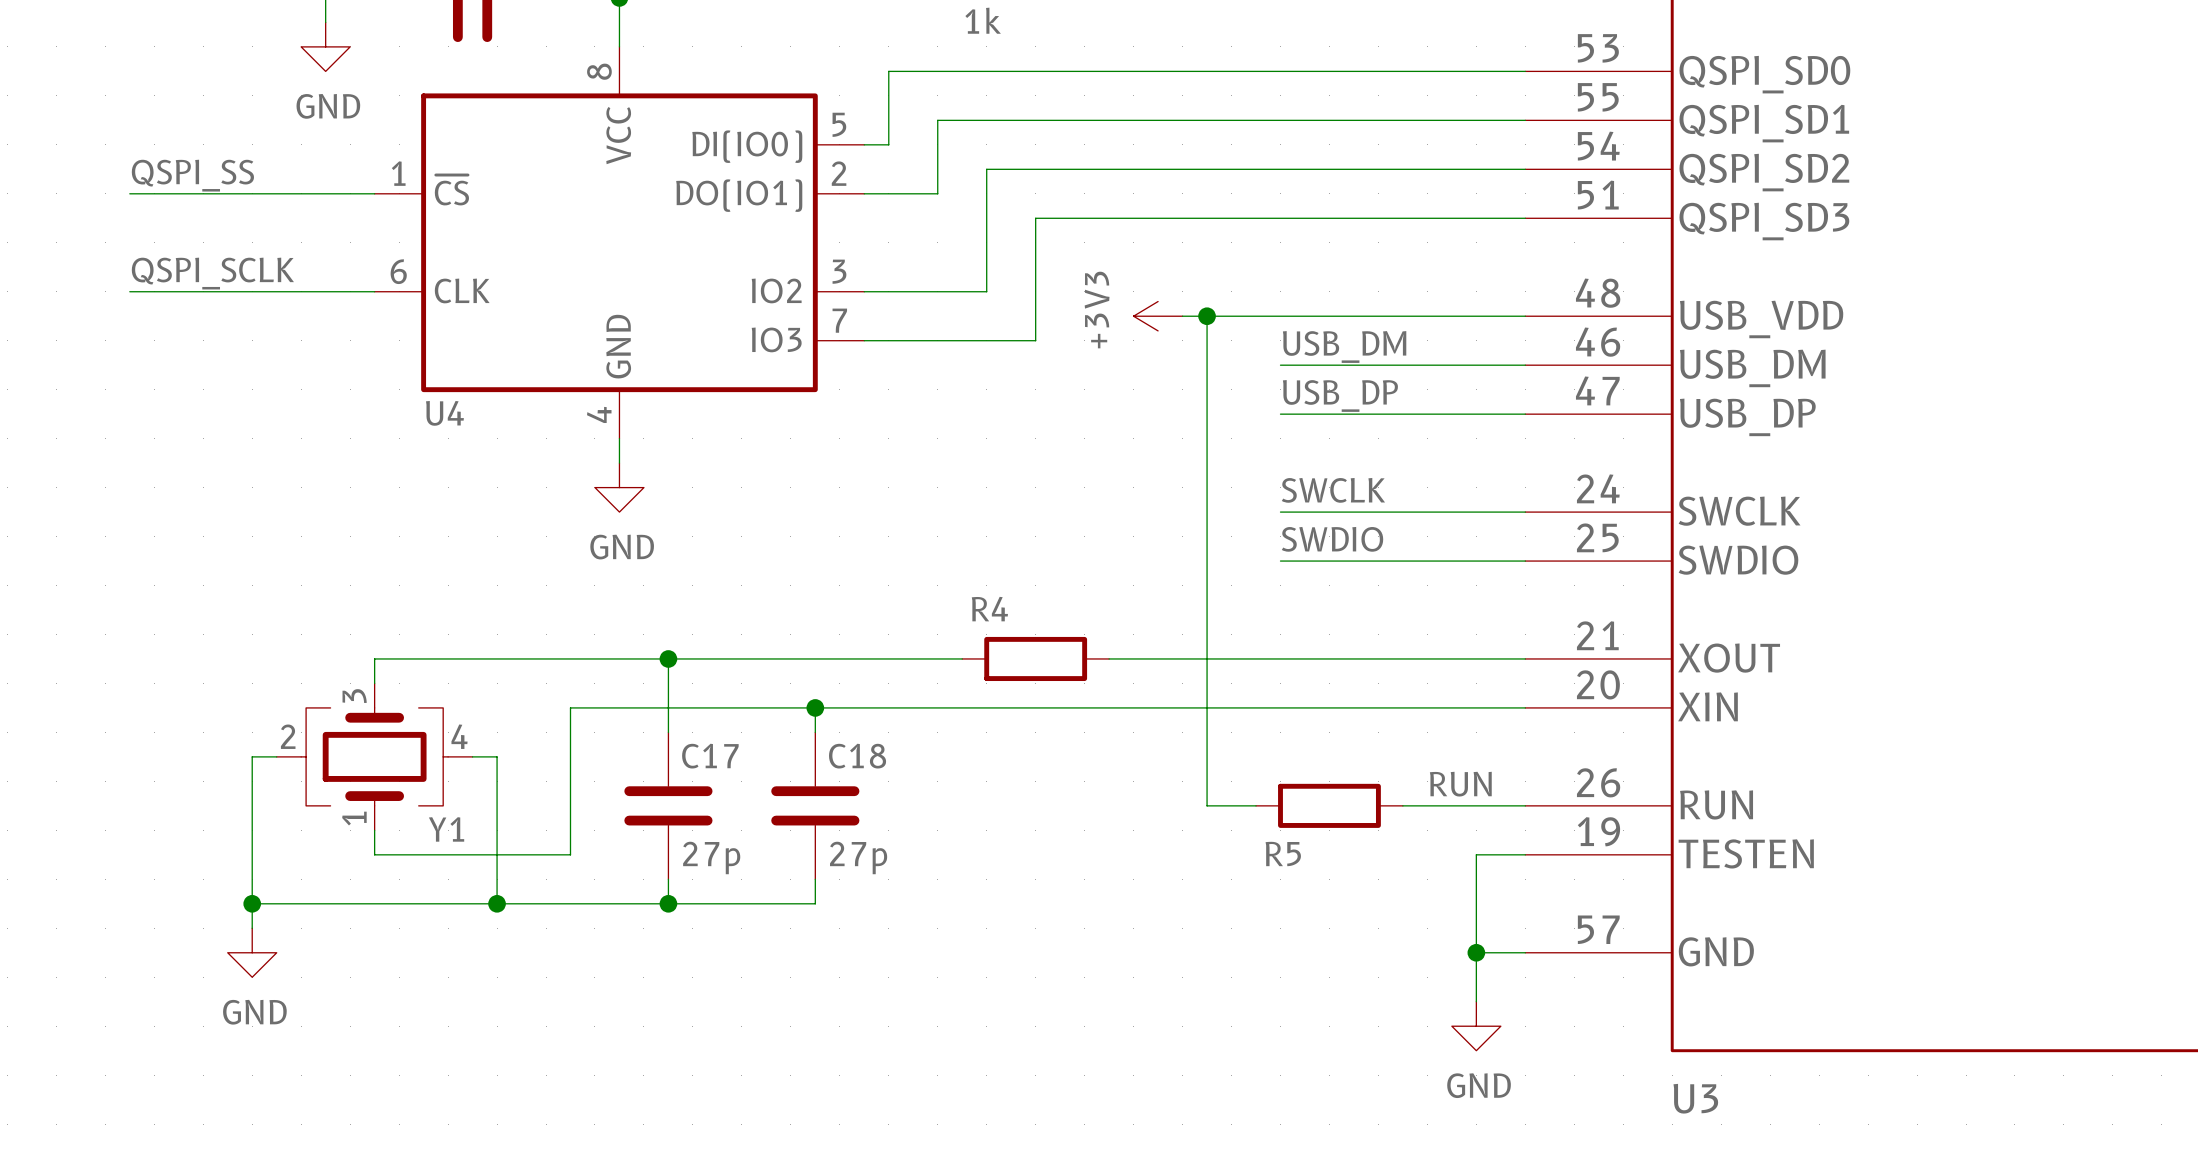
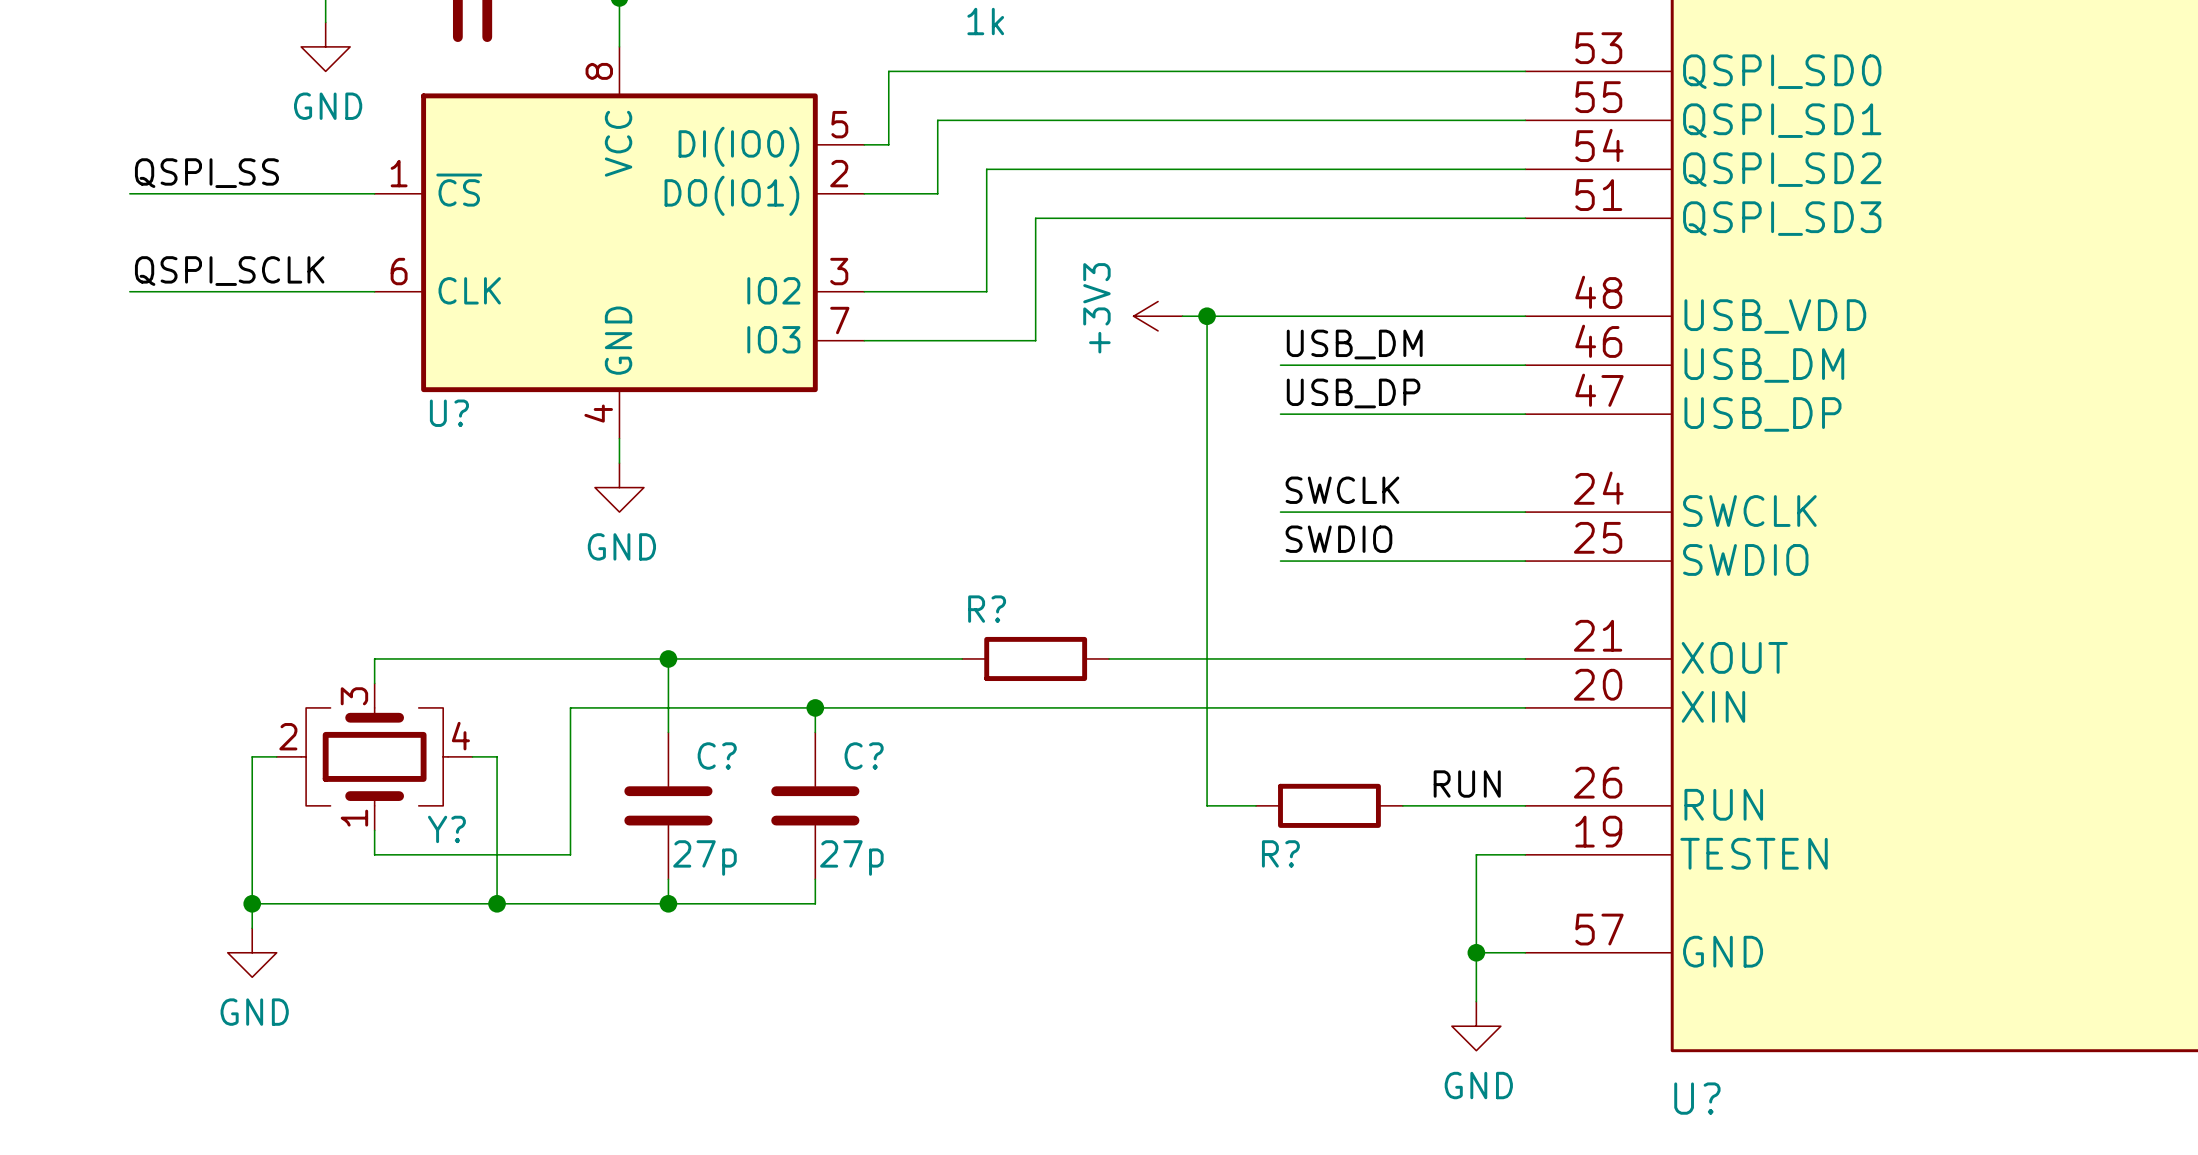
U4 name: U4 (444, 413) -> U? (449, 413)
R4 name: R4 (989, 609) -> R? (987, 609)
C17 name: C17 (710, 756) -> C? (717, 755)
C18 name: C18 (857, 756) -> C? (864, 755)
Y1 name: Y1 (446, 829) -> Y? (446, 829)
R5 name: R5 (1283, 853) -> R? (1280, 853)
U3 name: U3 (1695, 1098) -> U? (1697, 1098)

